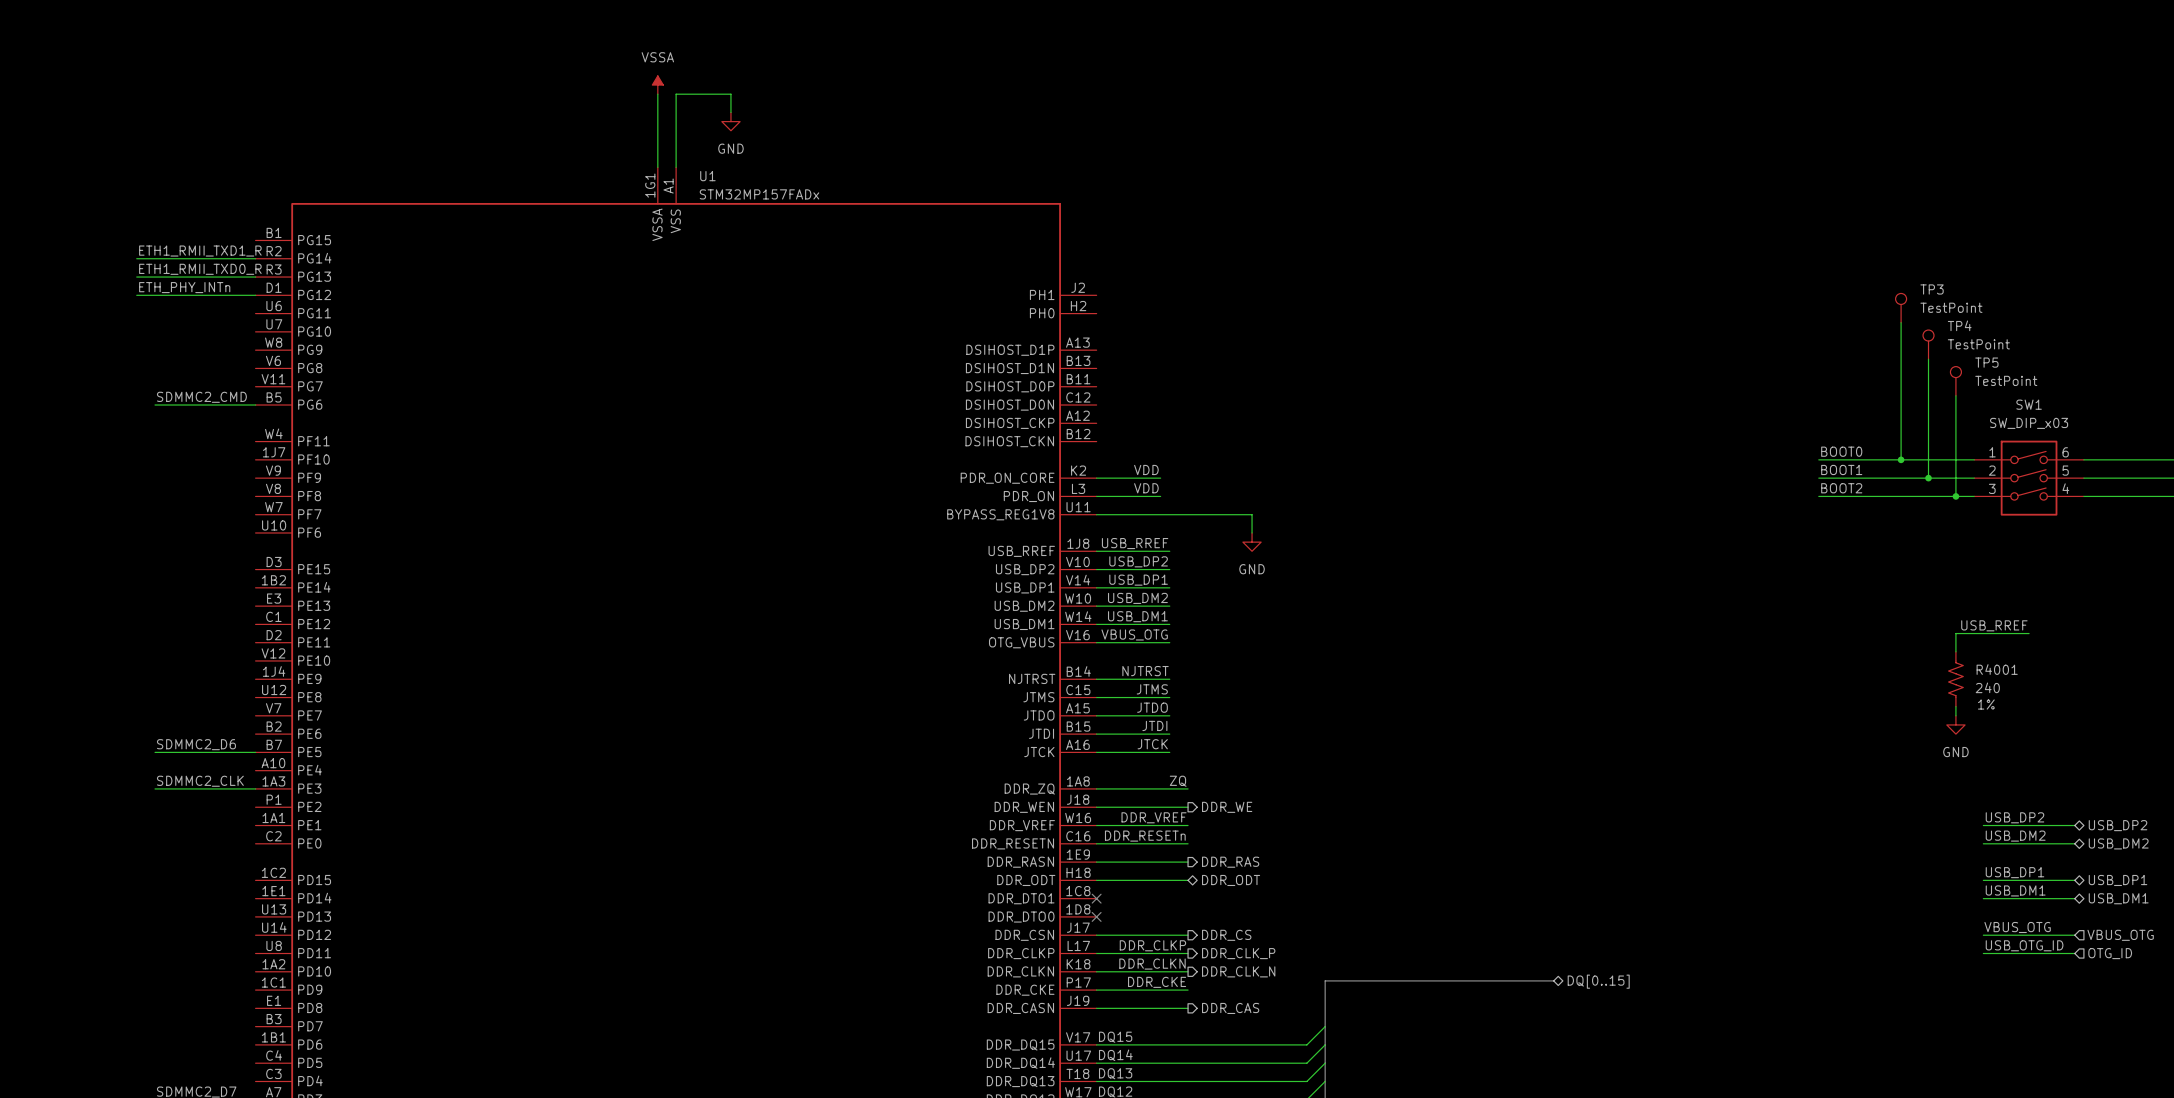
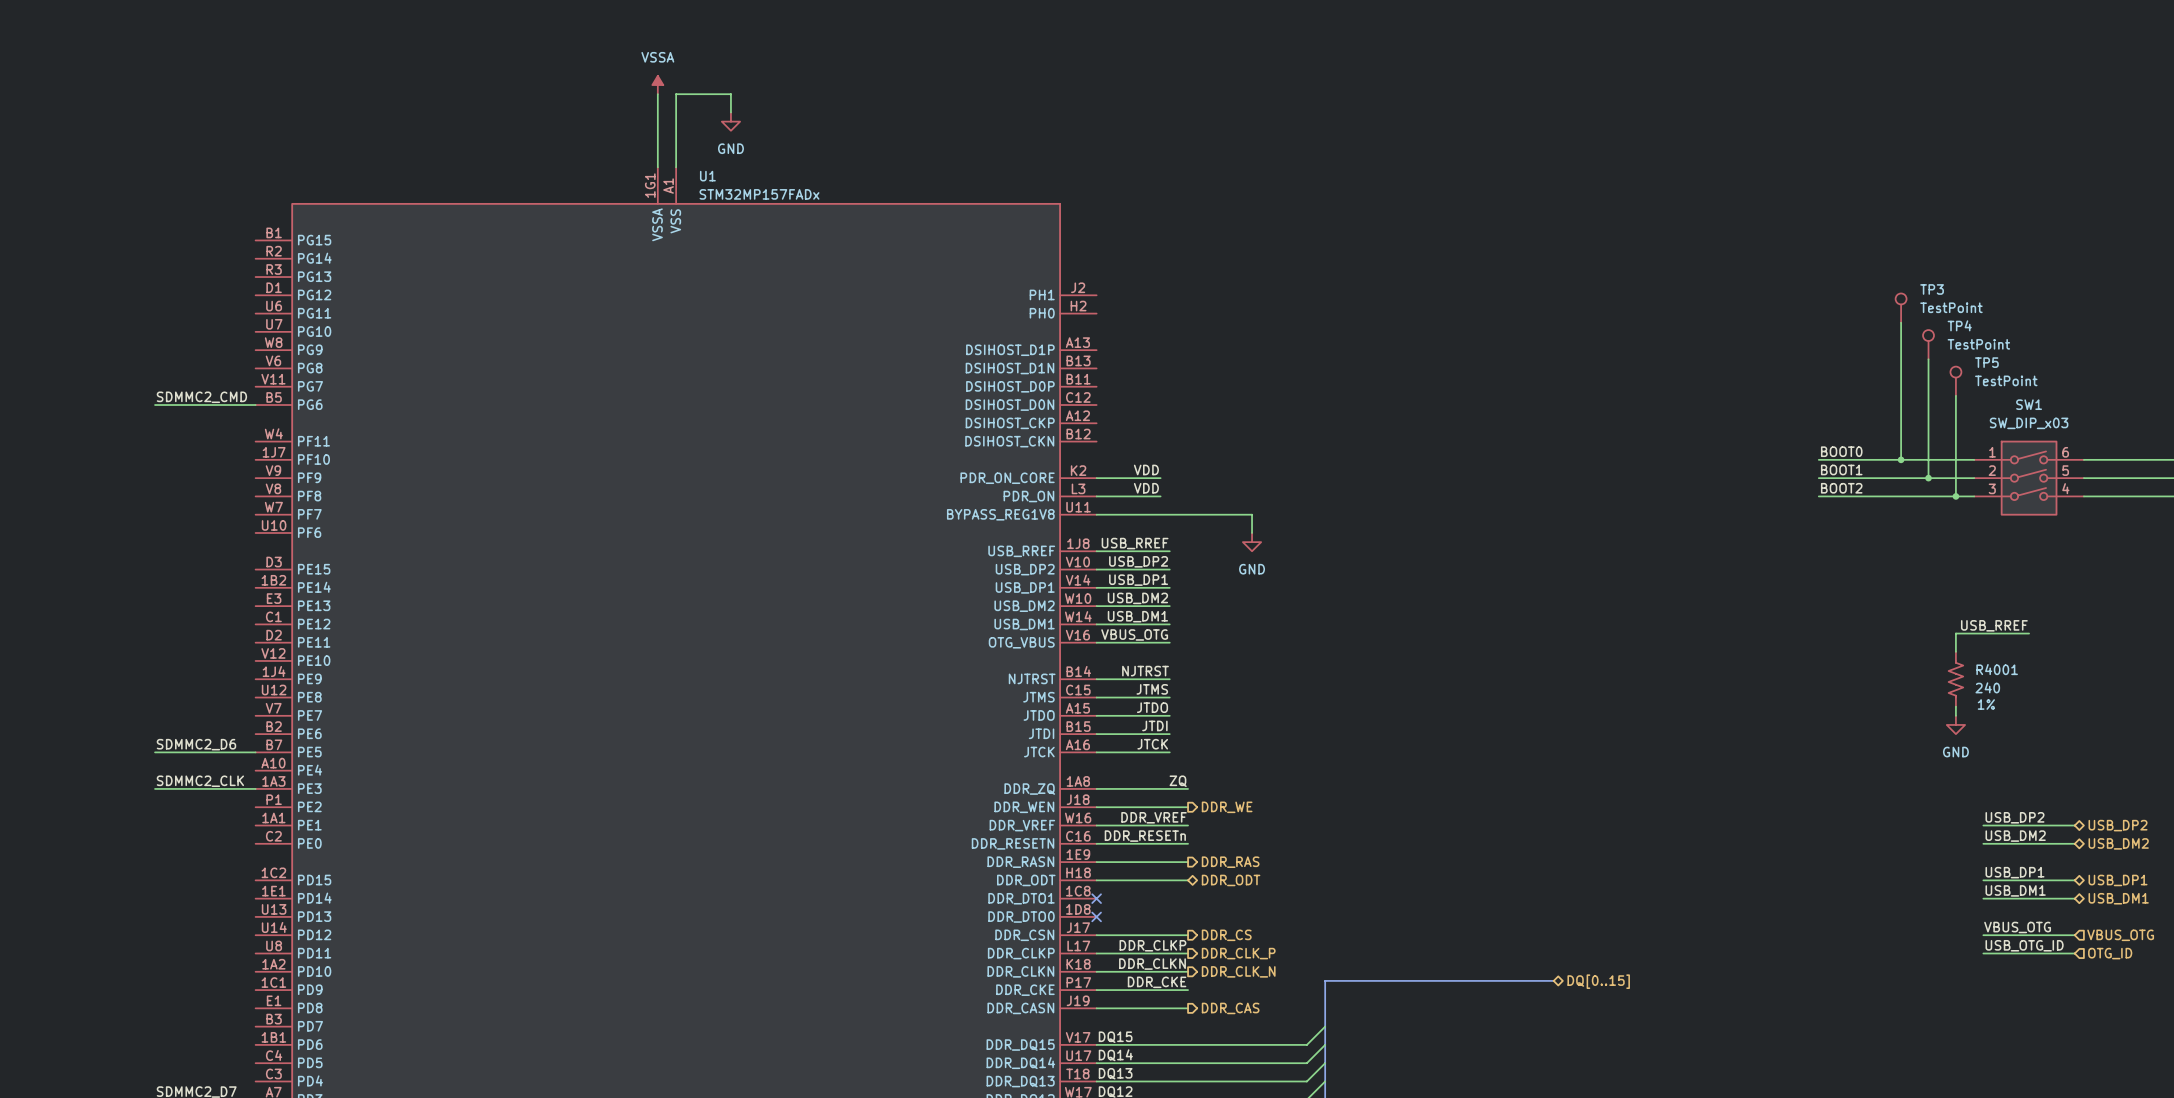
label: ETH1_RMII_TXD1_R (200, 251) -> none
wire: (136, 258) (255, 258) -> none
label: ETH1_RMII_TXD0_R (200, 269) -> none
wire: (136, 277) (255, 277) -> none
label: ETH_PHY_INTn (184, 287) -> none
wire: (136, 295) (255, 295) -> none

